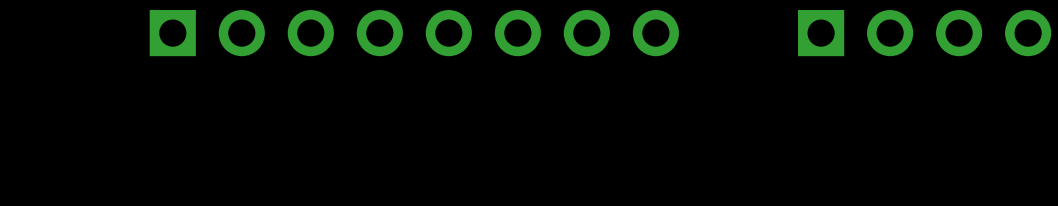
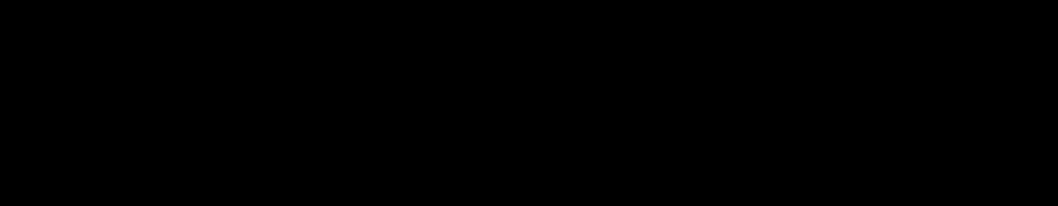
part: (414, 33) -> none
part: (924, 33) -> none

